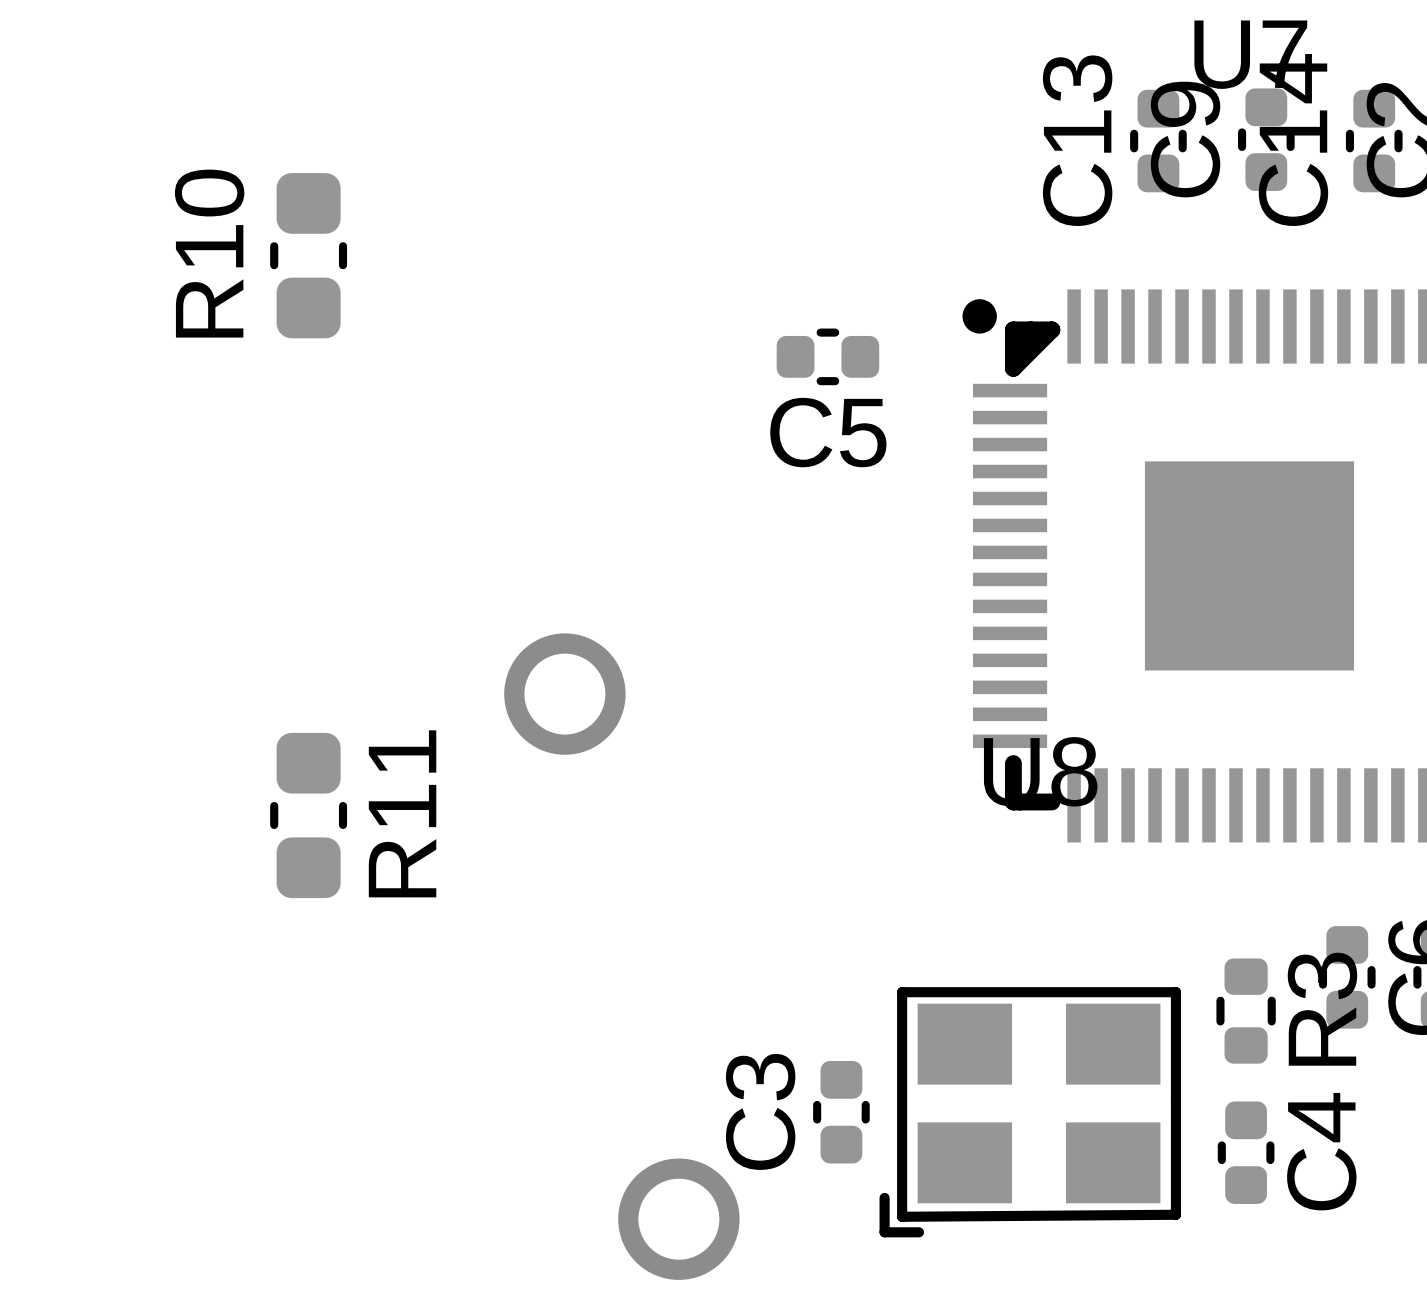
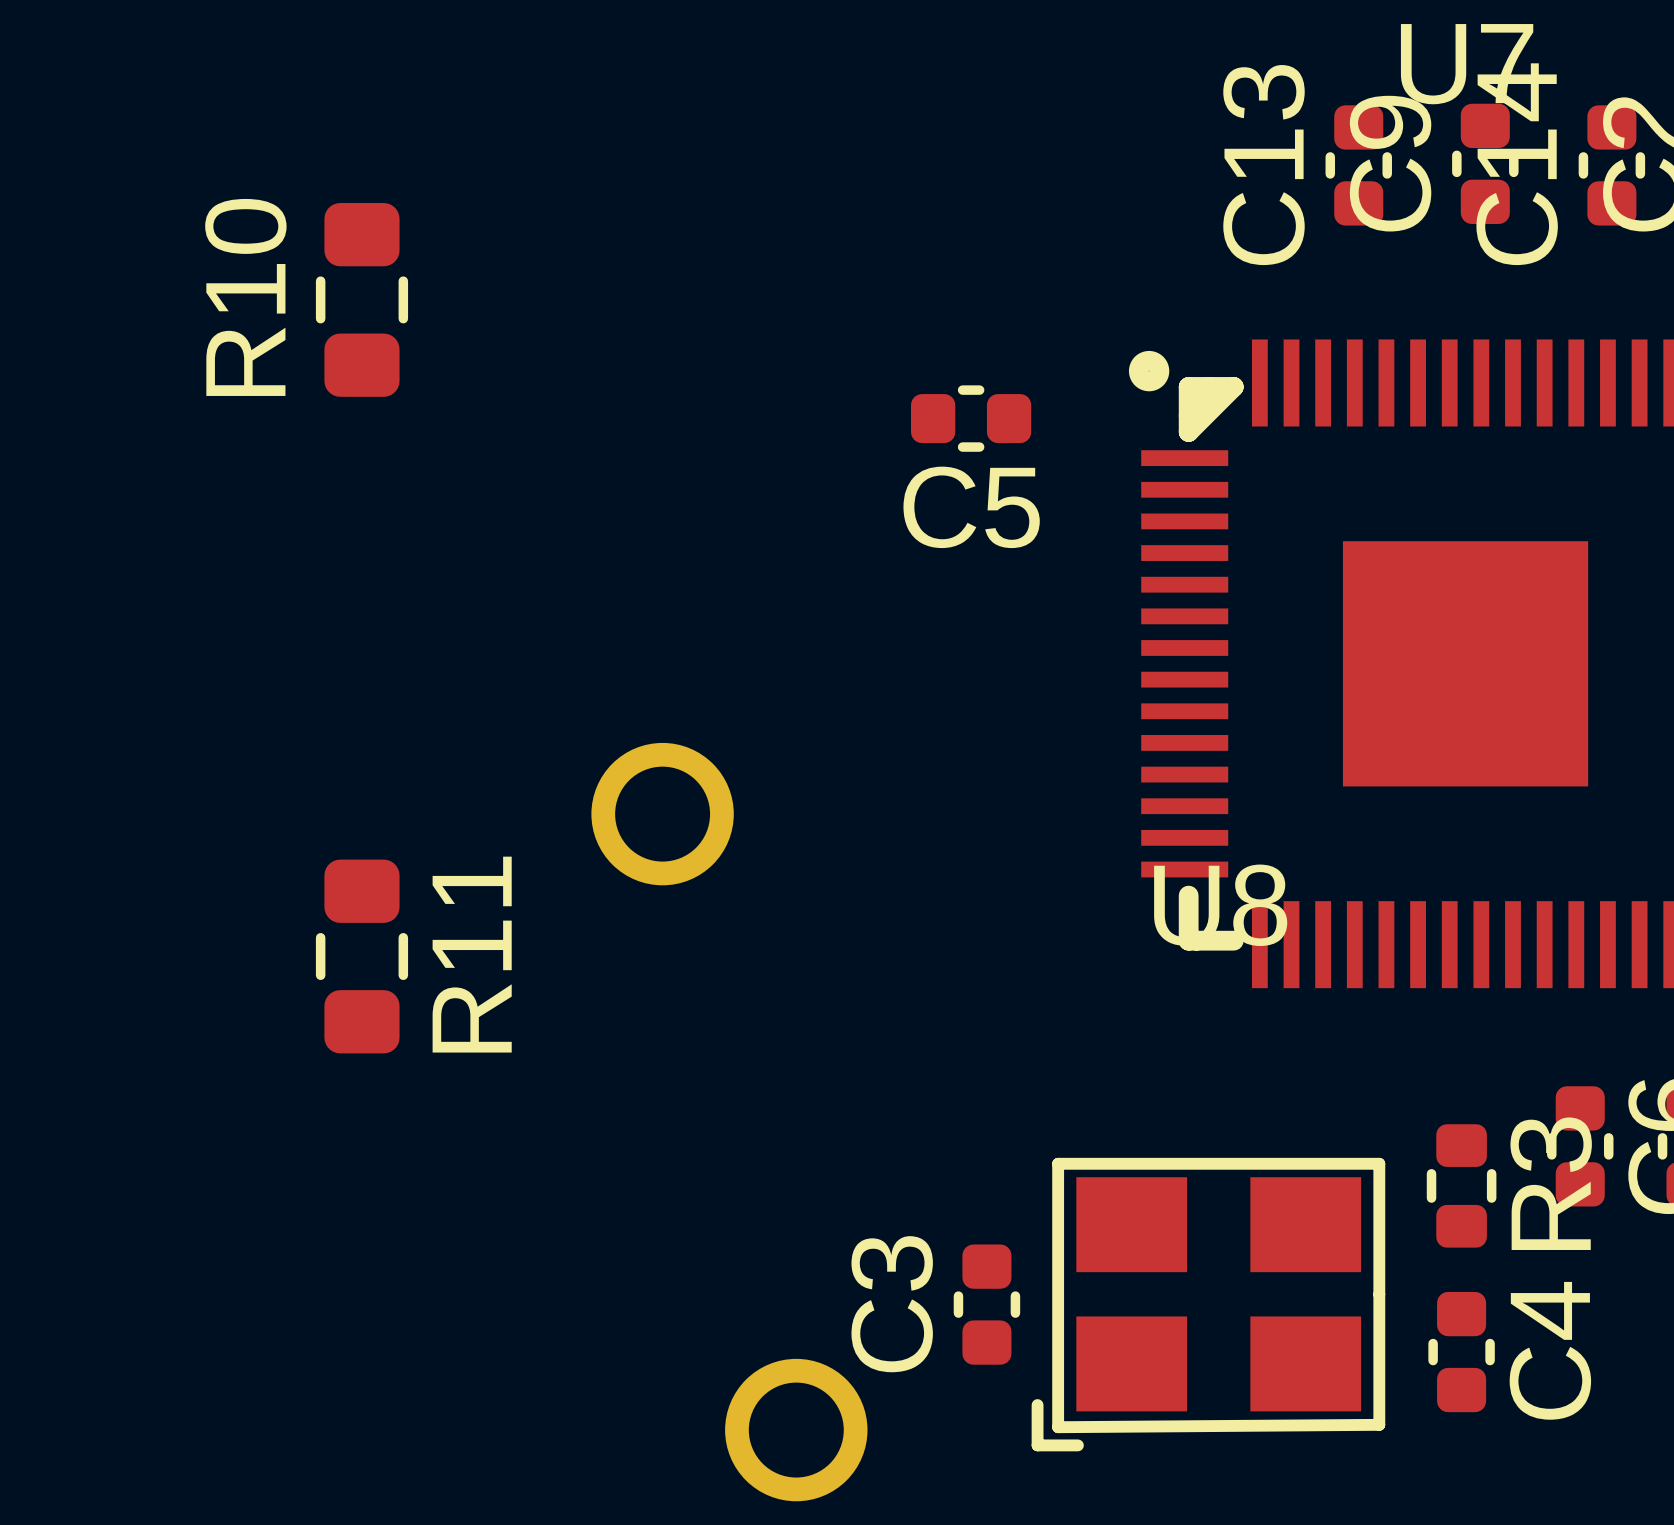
R10 footprint: [270, 173, 348, 339] -> [315, 203, 409, 397]
R11 footprint: [270, 732, 348, 899] -> [315, 859, 409, 1054]

